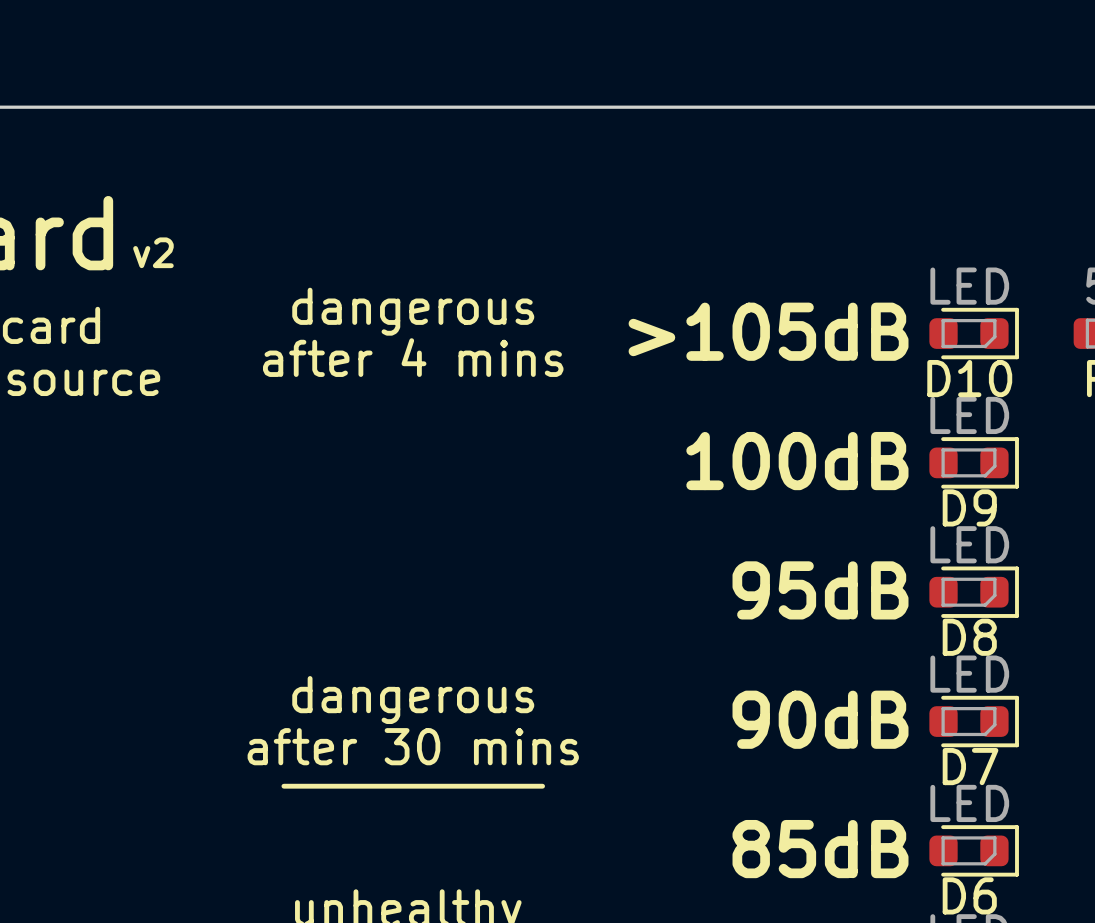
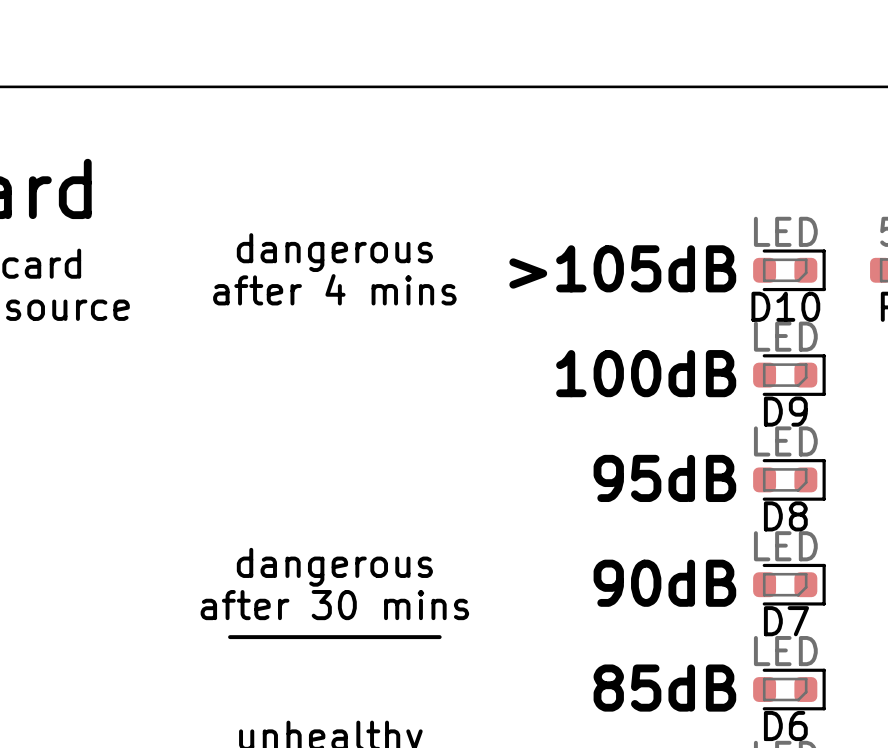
text: v2 (153, 252) -> none

